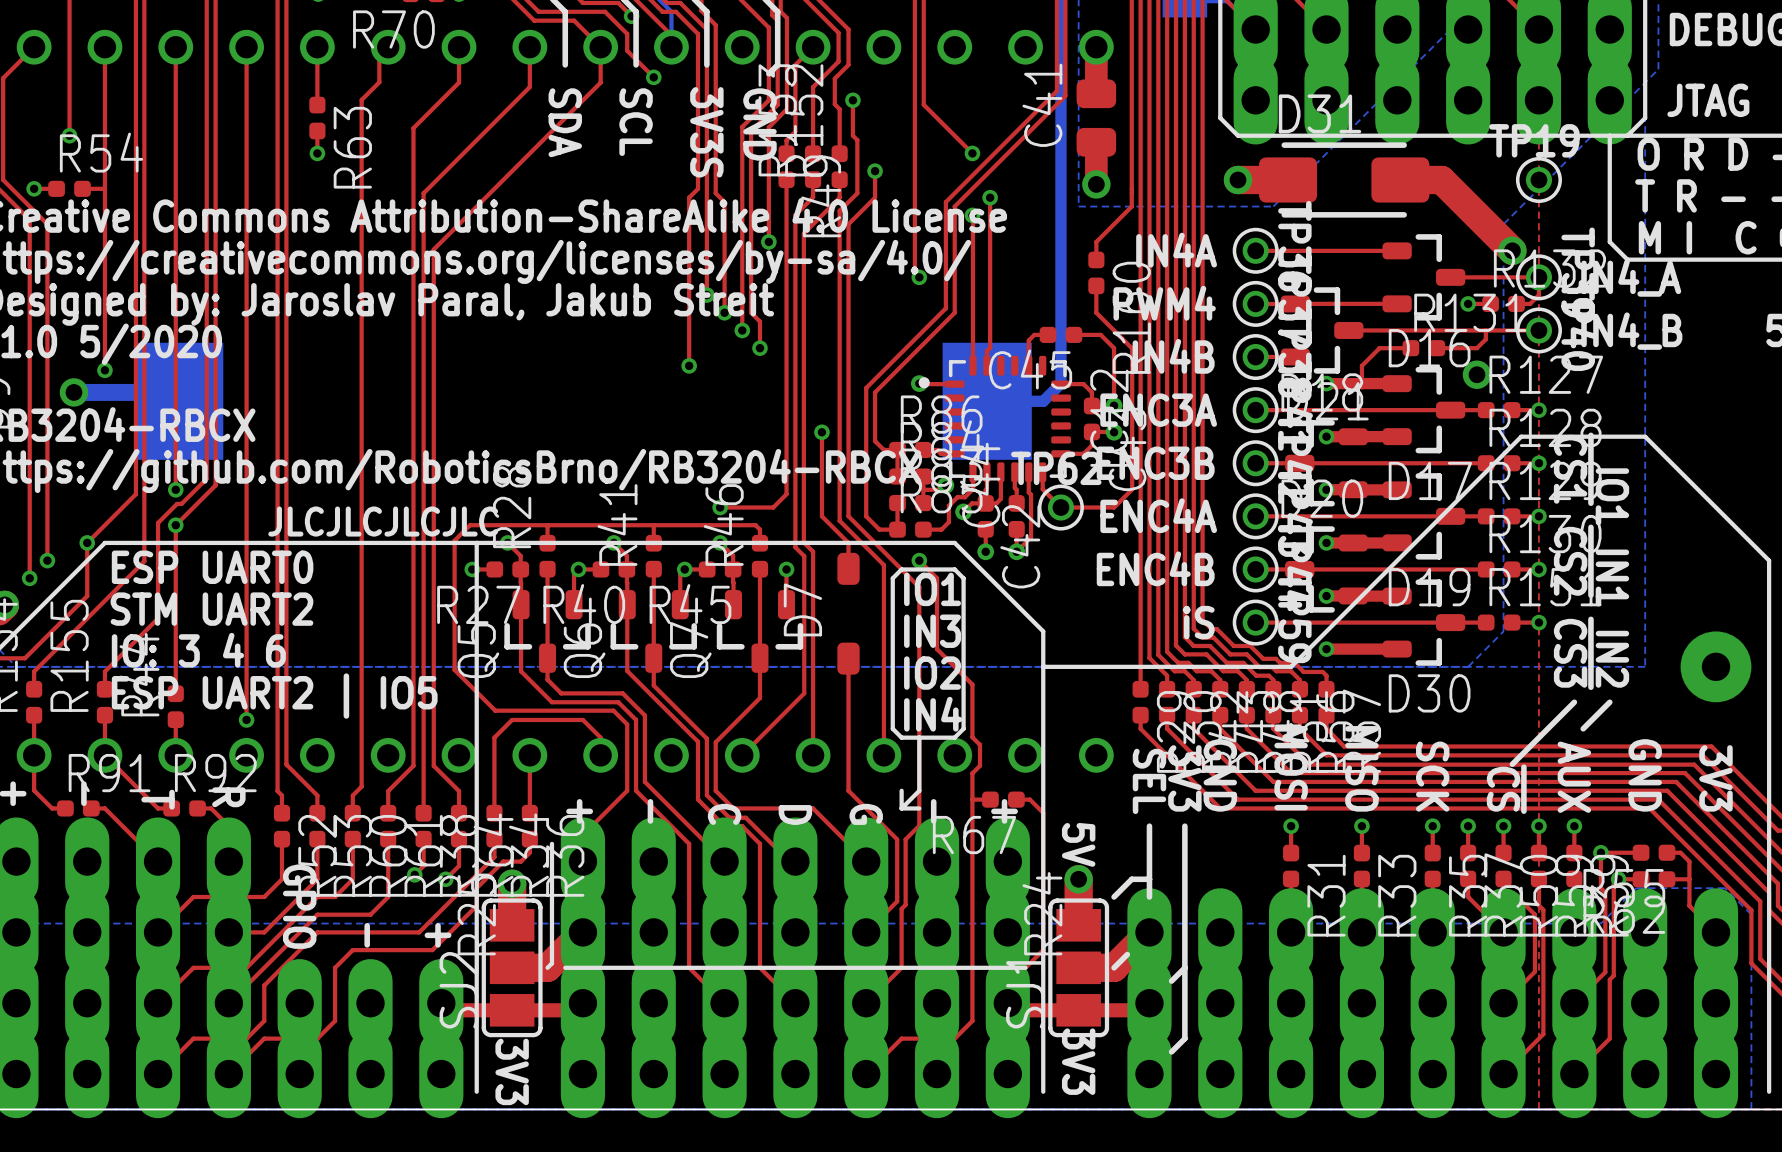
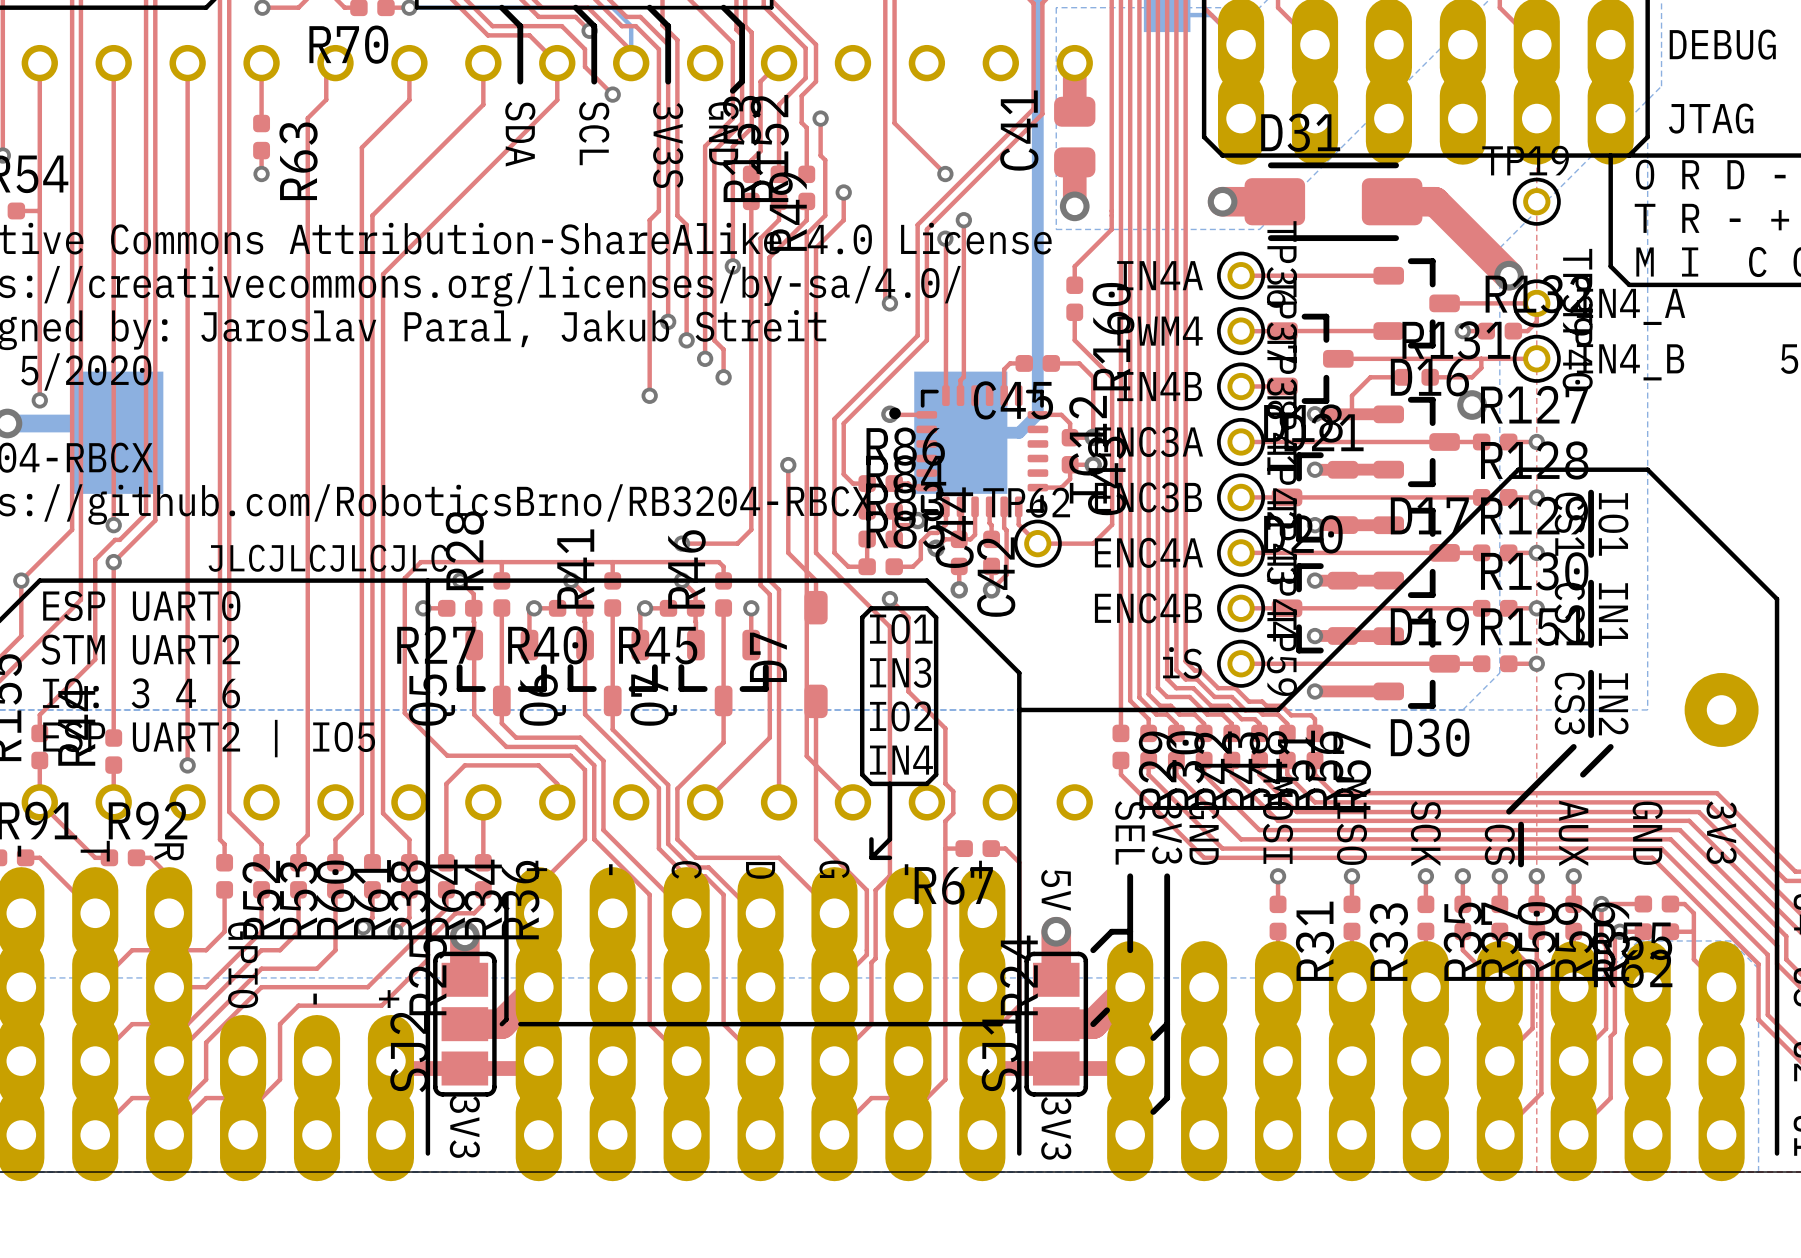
top track: (839, 520) (883, 565) (883, 755) -> (806, 557) (806, 756) (852, 802)

